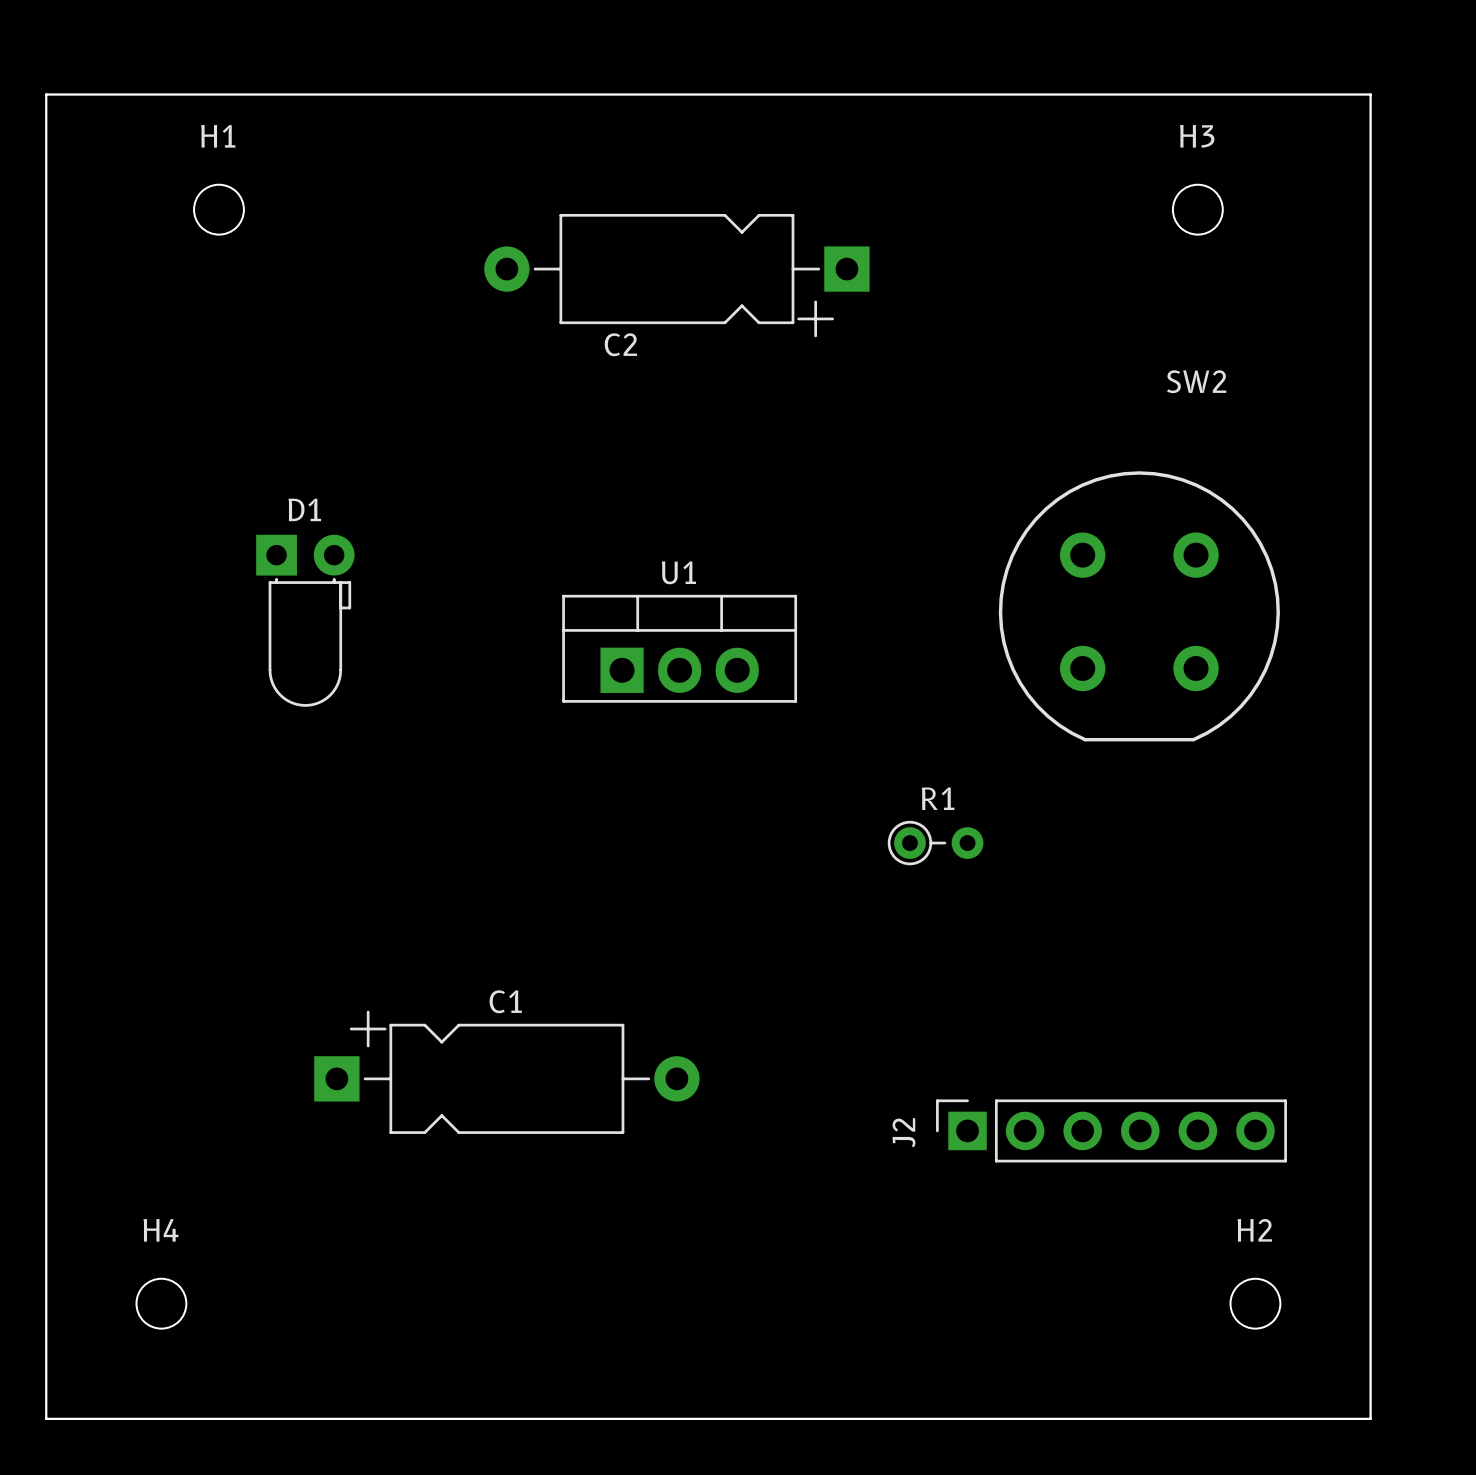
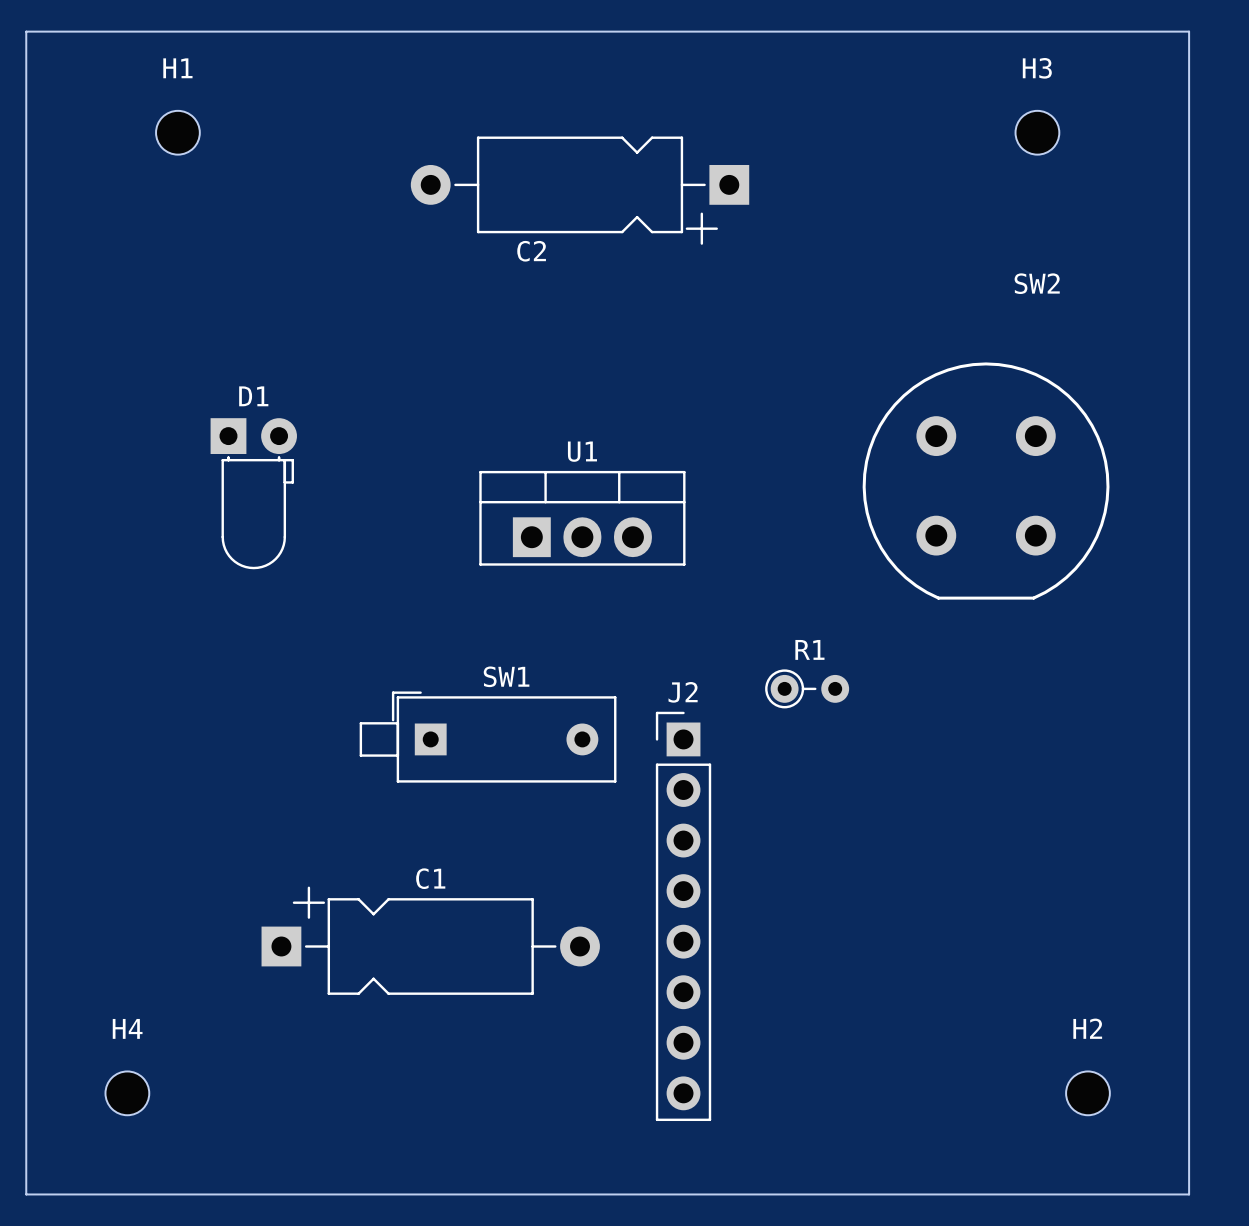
SW1: none -> (488, 737)
C1 footprint: [314, 1010, 700, 1134] -> [261, 886, 600, 995]
J2 footprint: [936, 1099, 1287, 1163] -> [655, 711, 712, 1122]
J2 name position: J2 (904, 1132) -> J2 (683, 692)

